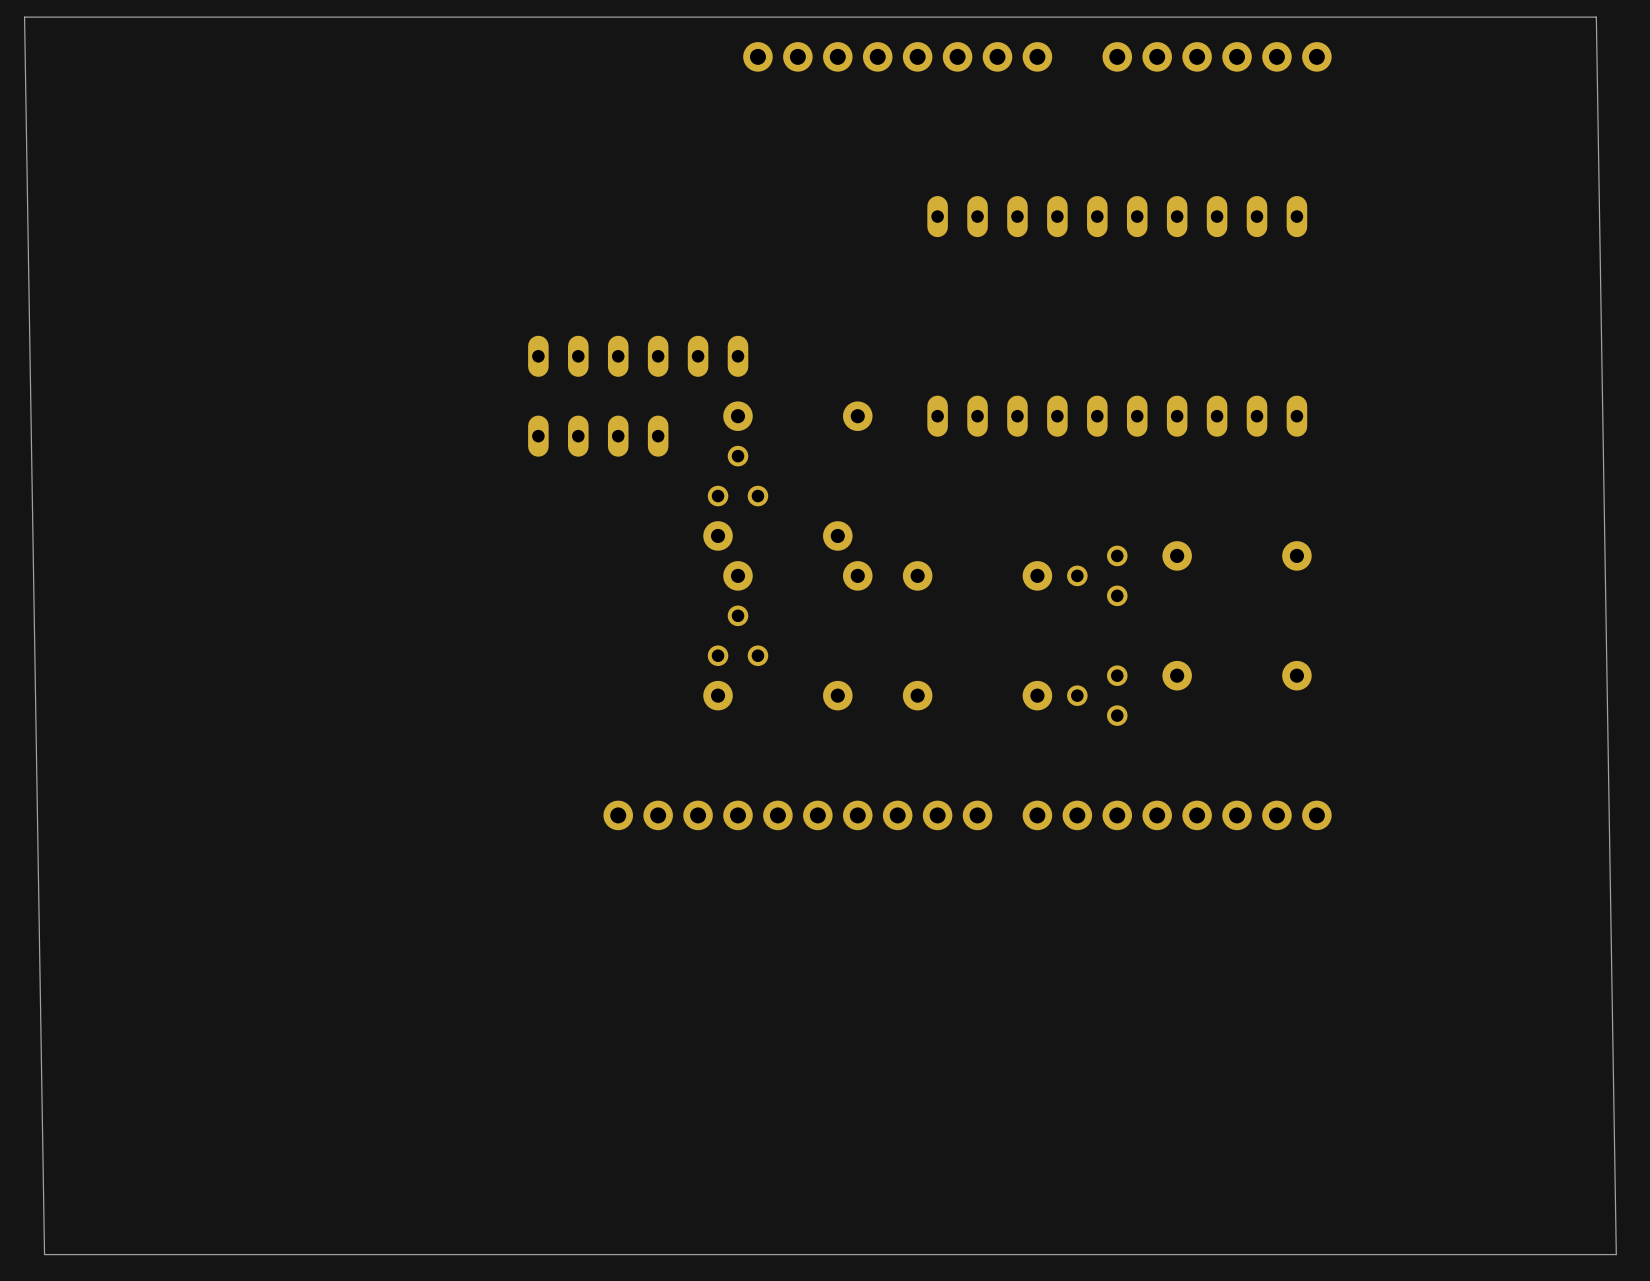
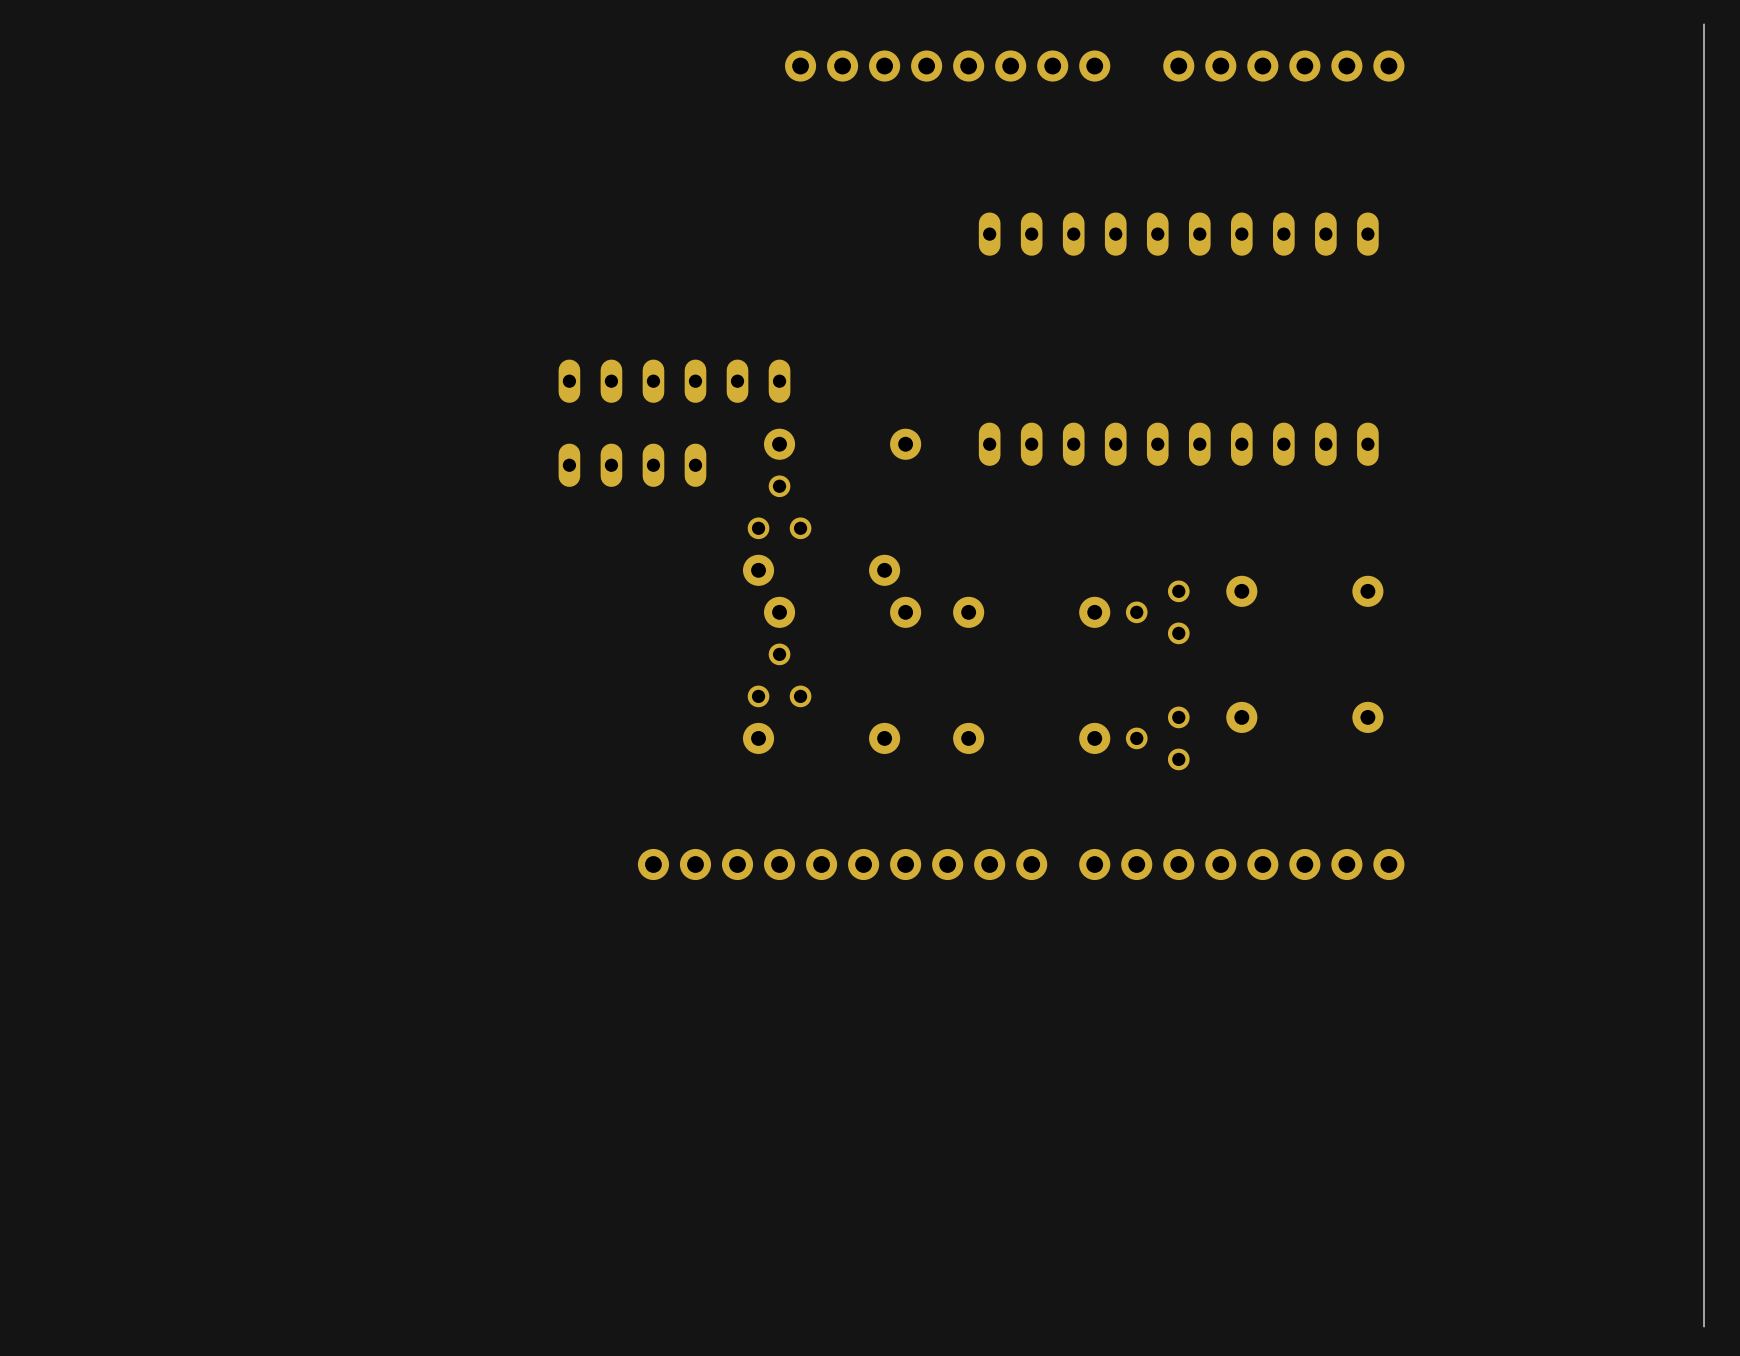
board edge: (1596, 17) (24, 17) (44, 1254) (1616, 1254) (1596, 17) -> none
board edge: none -> (1704, 24) (1704, 1326)

